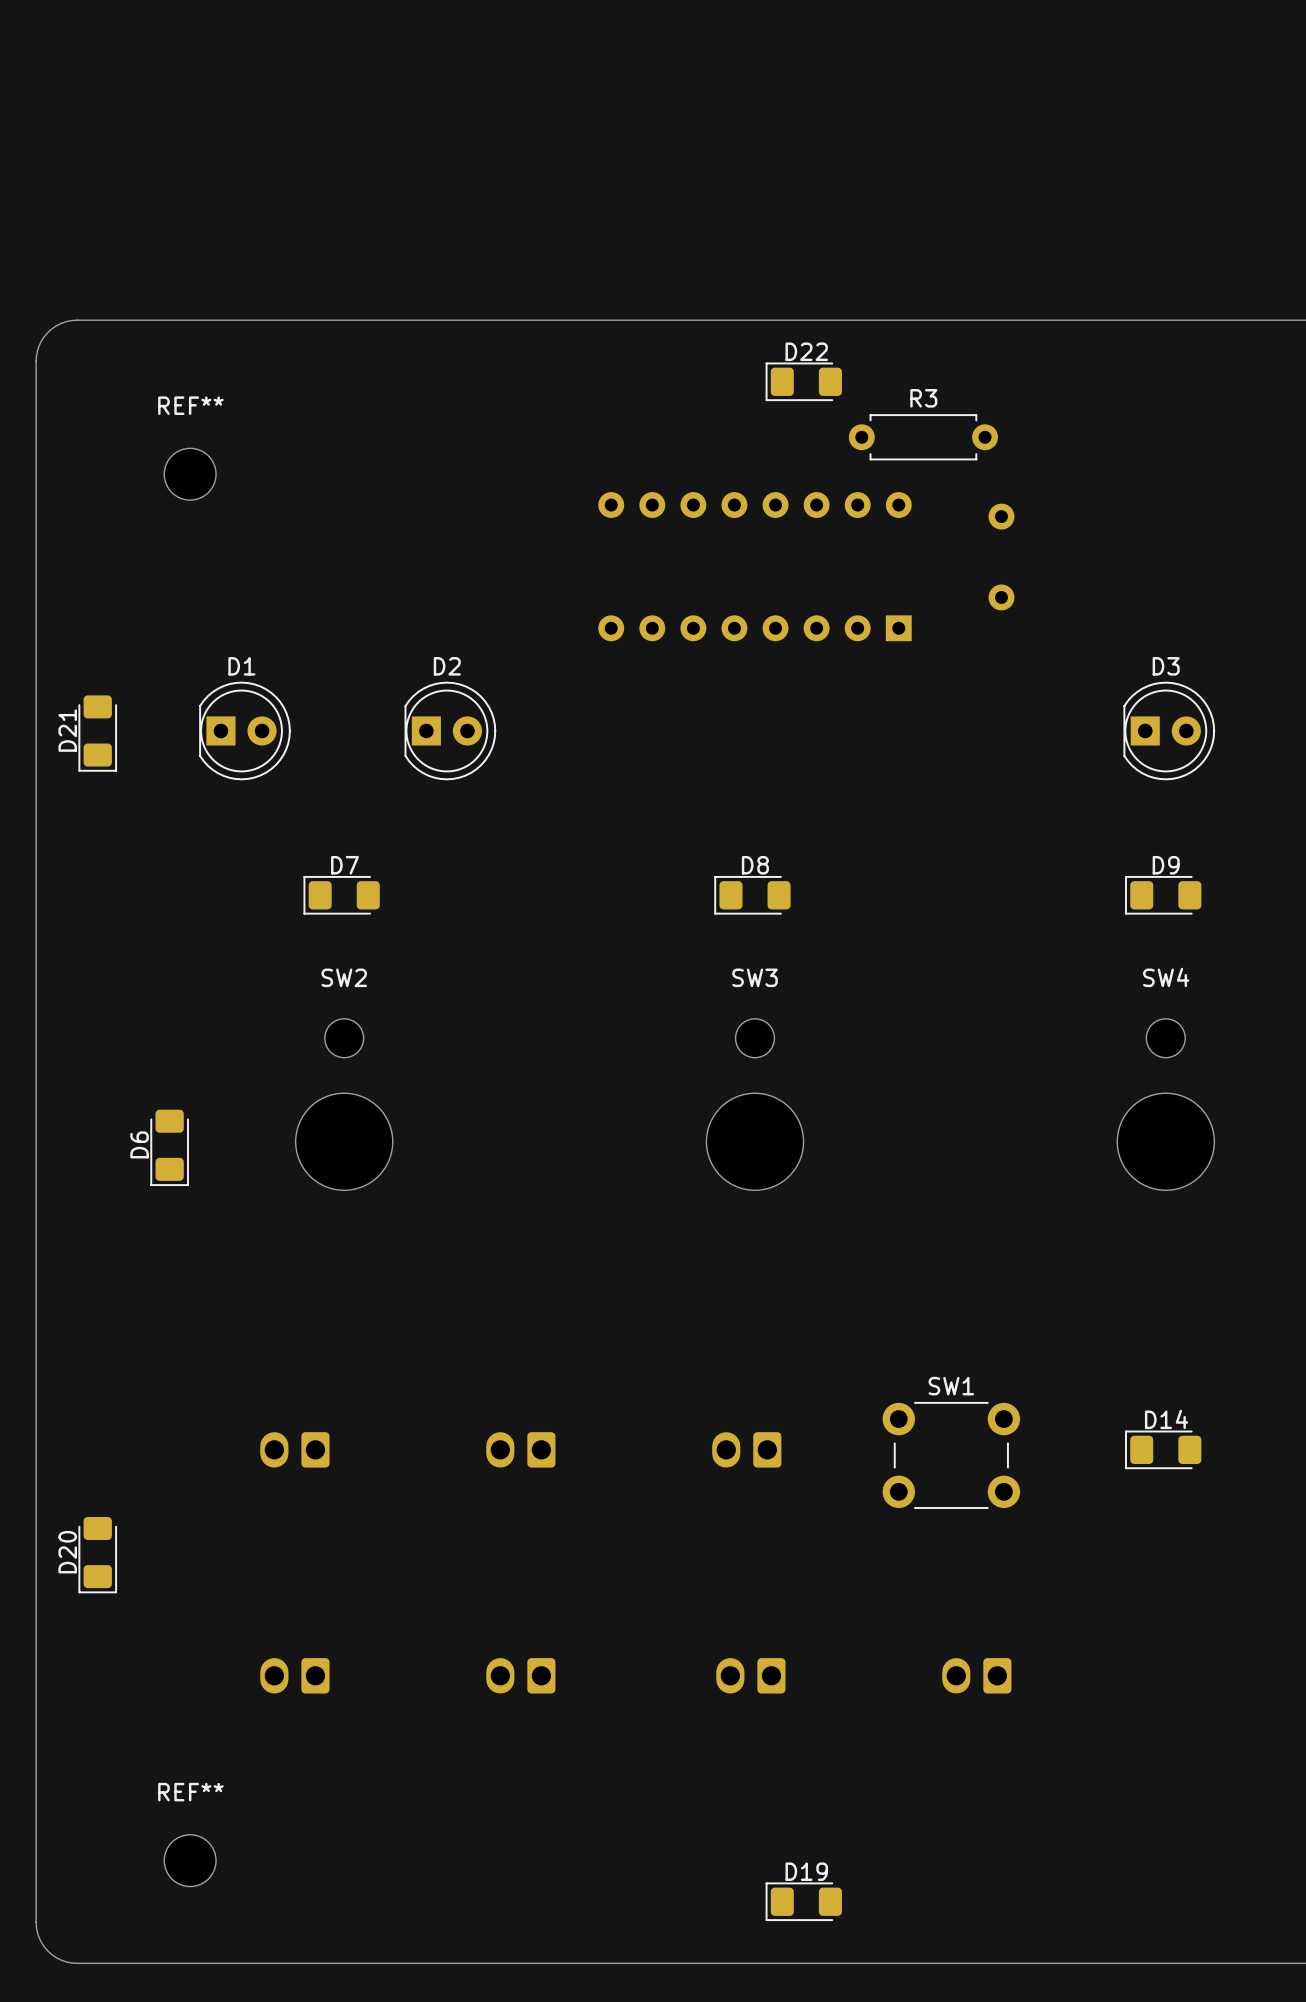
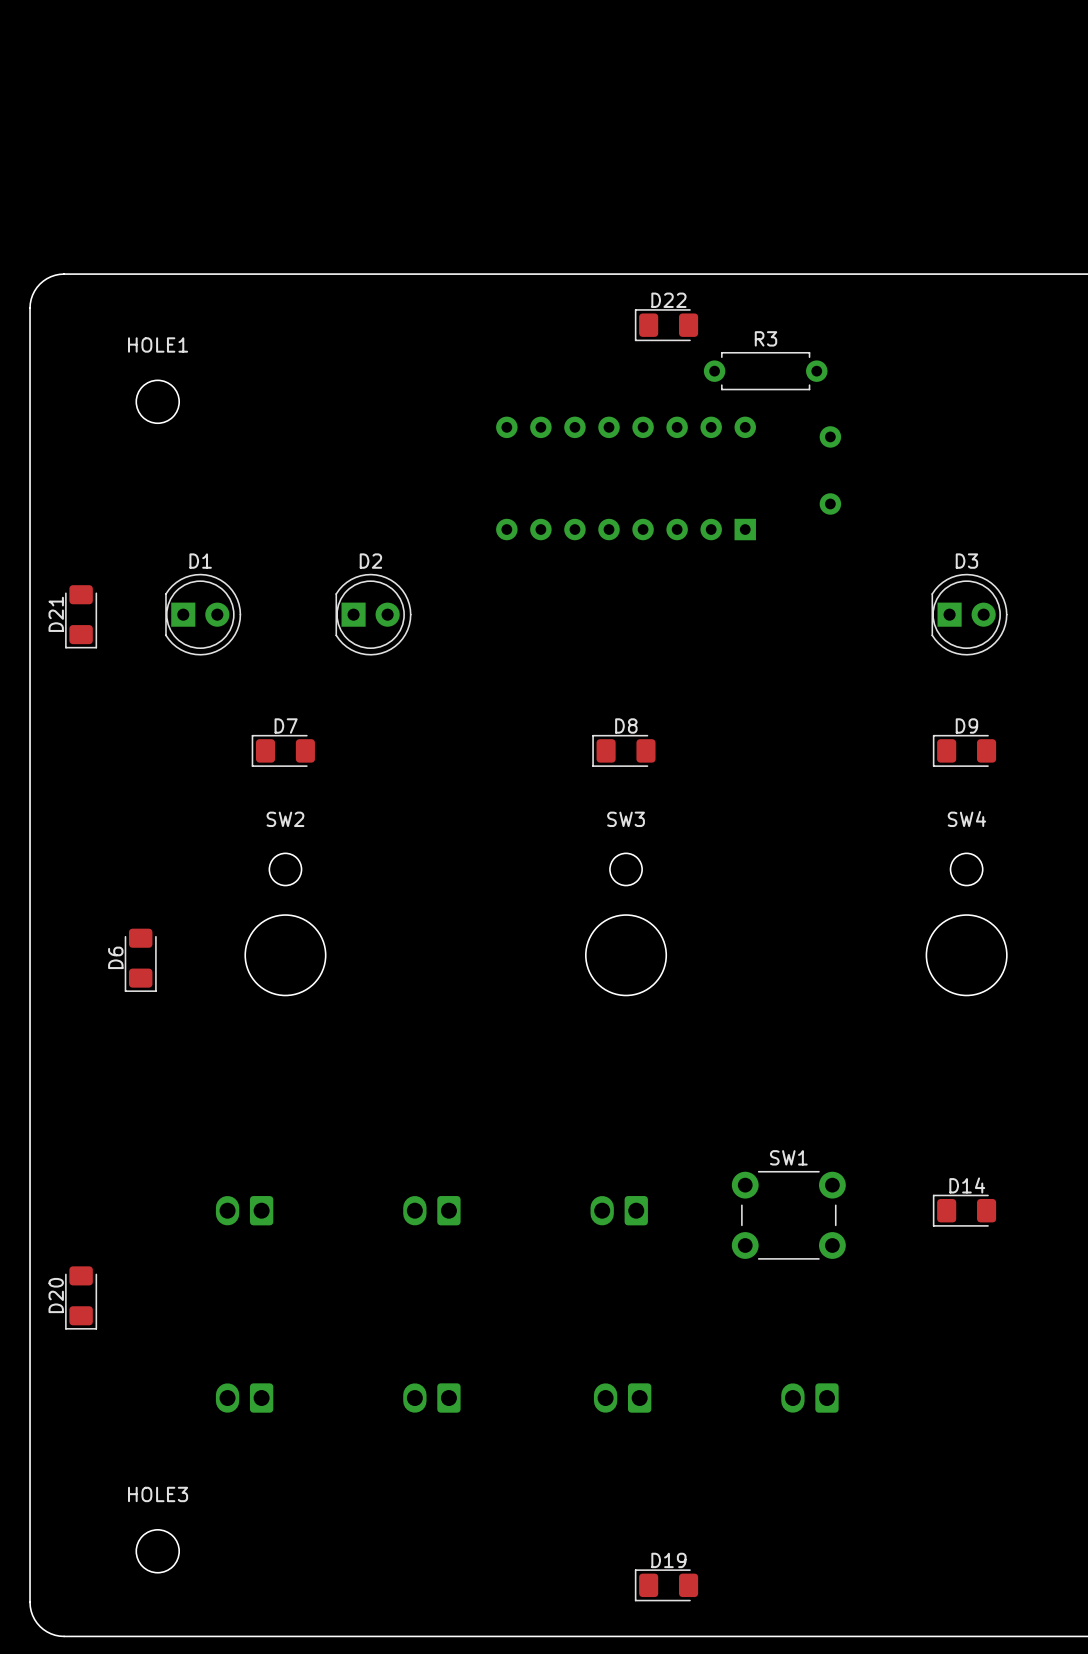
REF** name: REF** (190, 405) -> HOLE1 (158, 344)
REF** name: REF** (190, 1792) -> HOLE3 (158, 1494)

